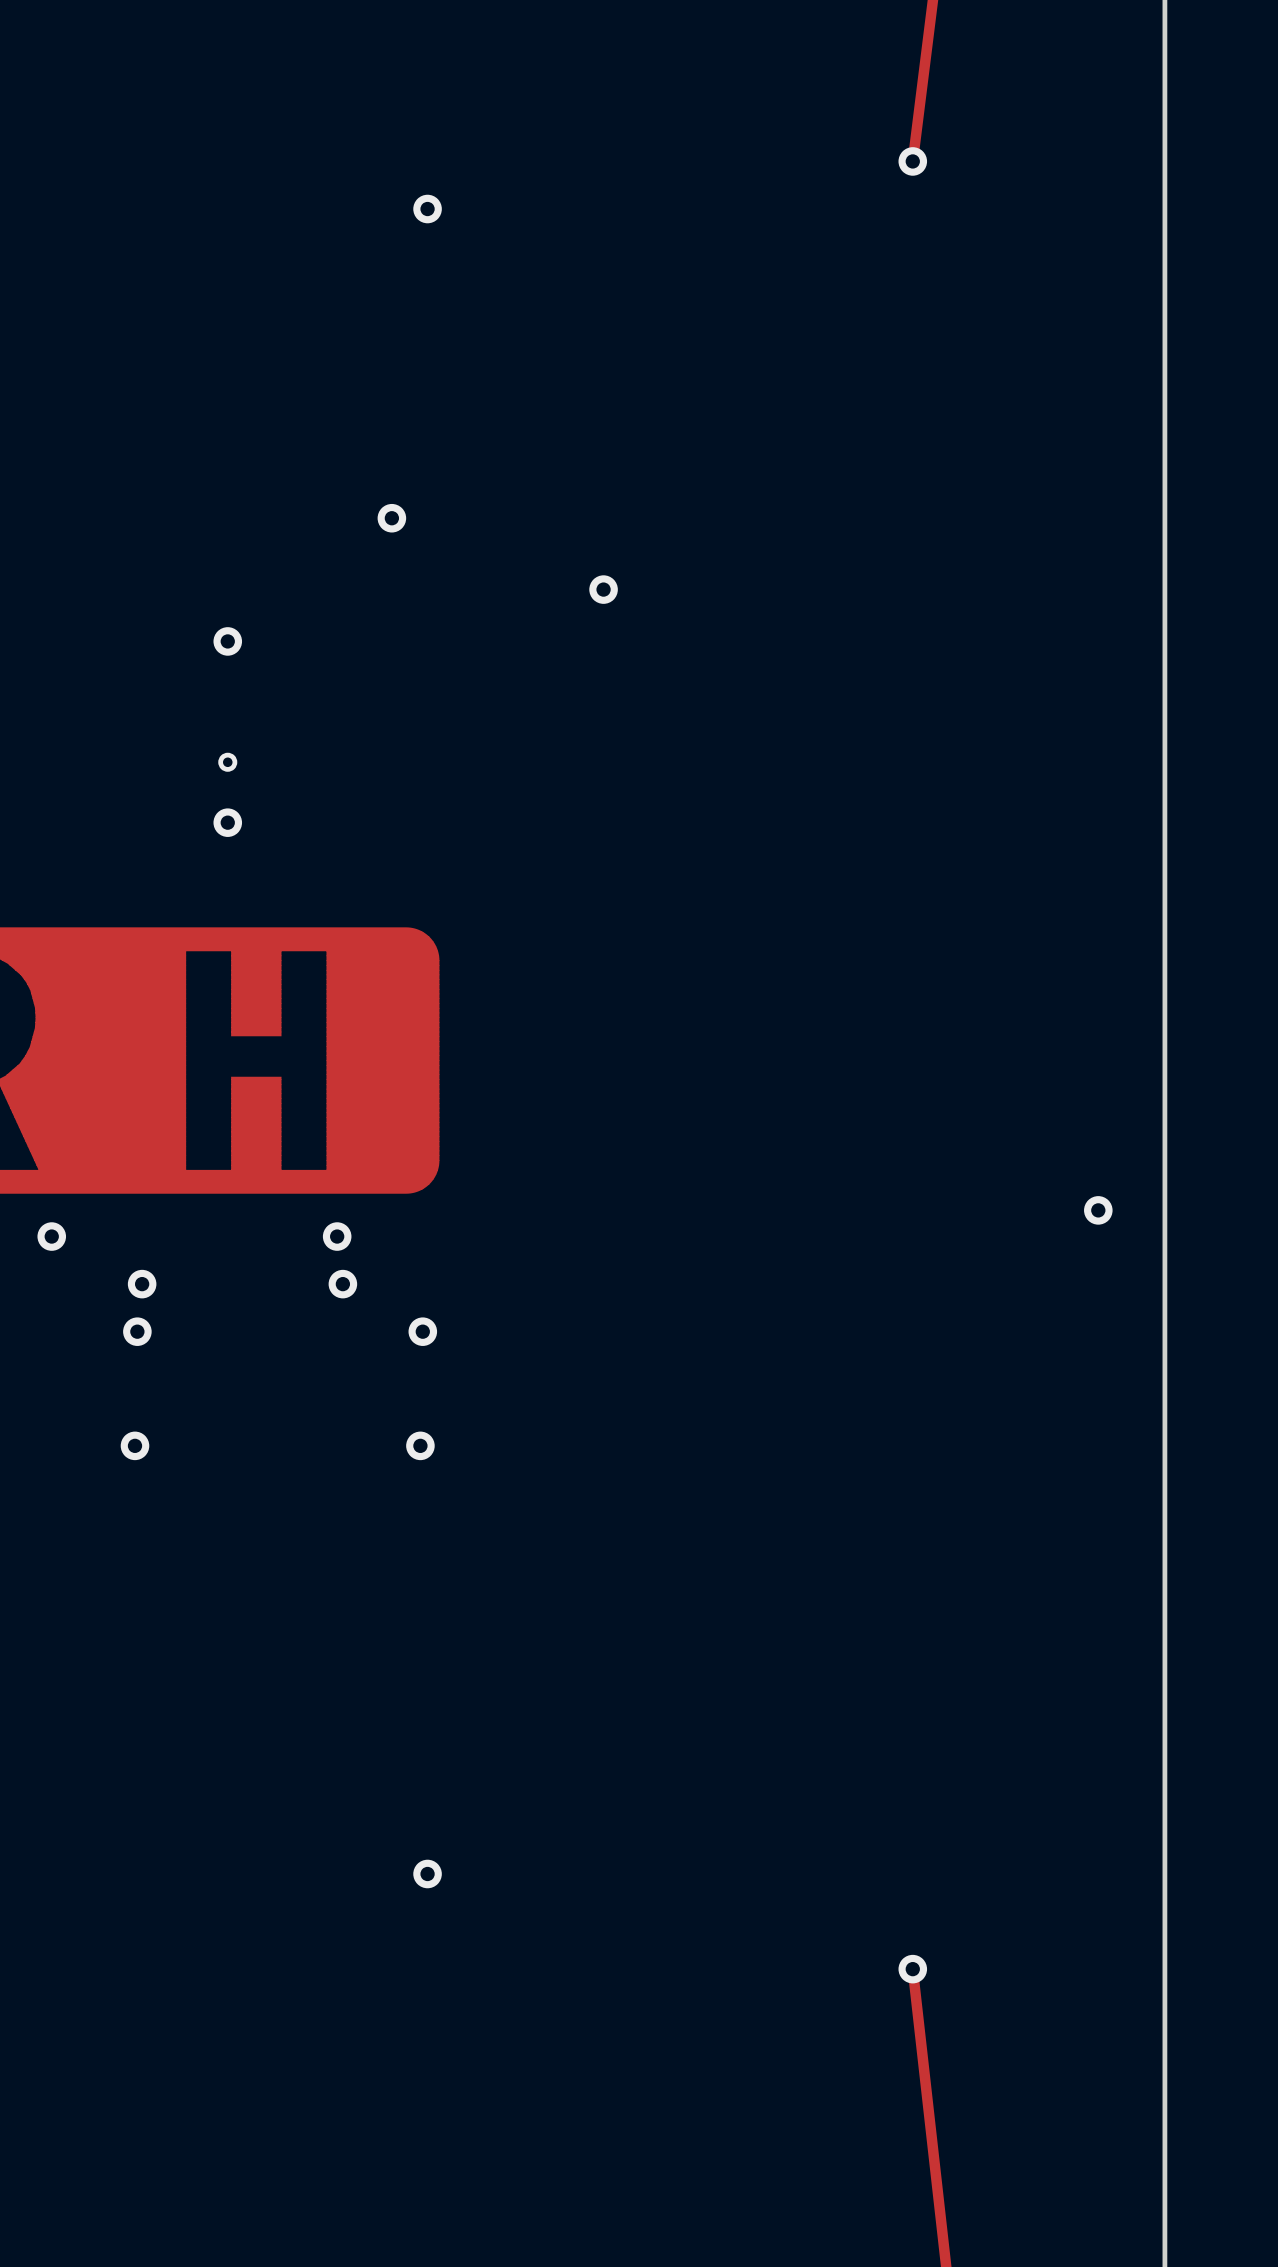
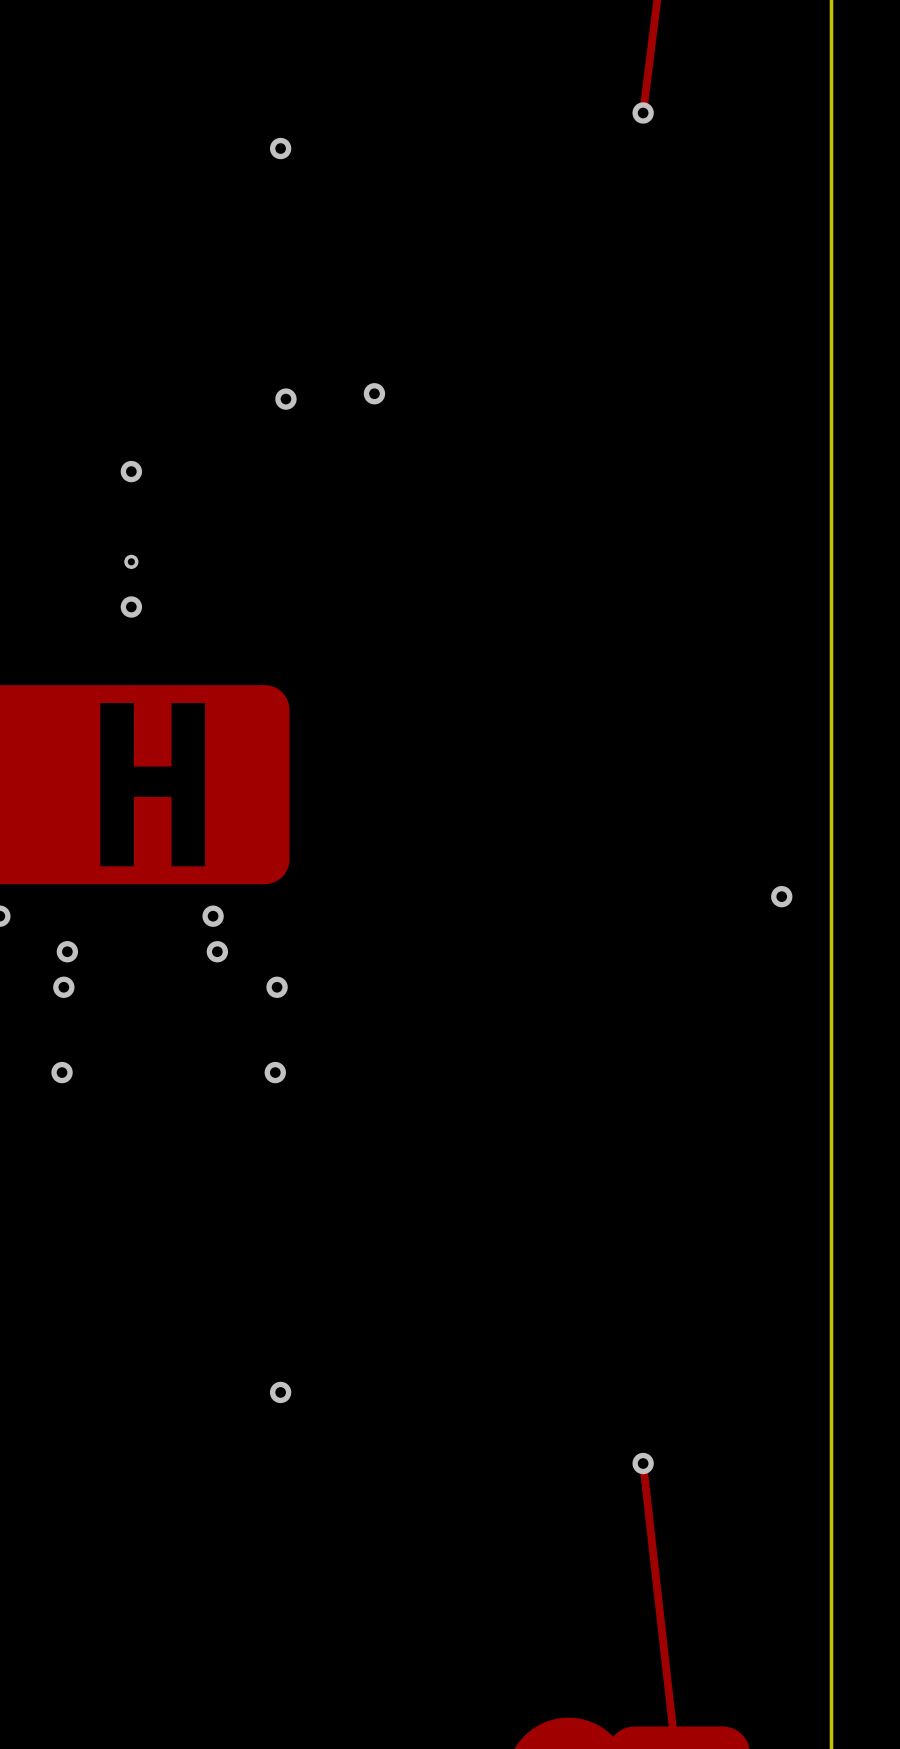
via position: (391, 518) -> (285, 399)
via position: (603, 589) -> (374, 393)

